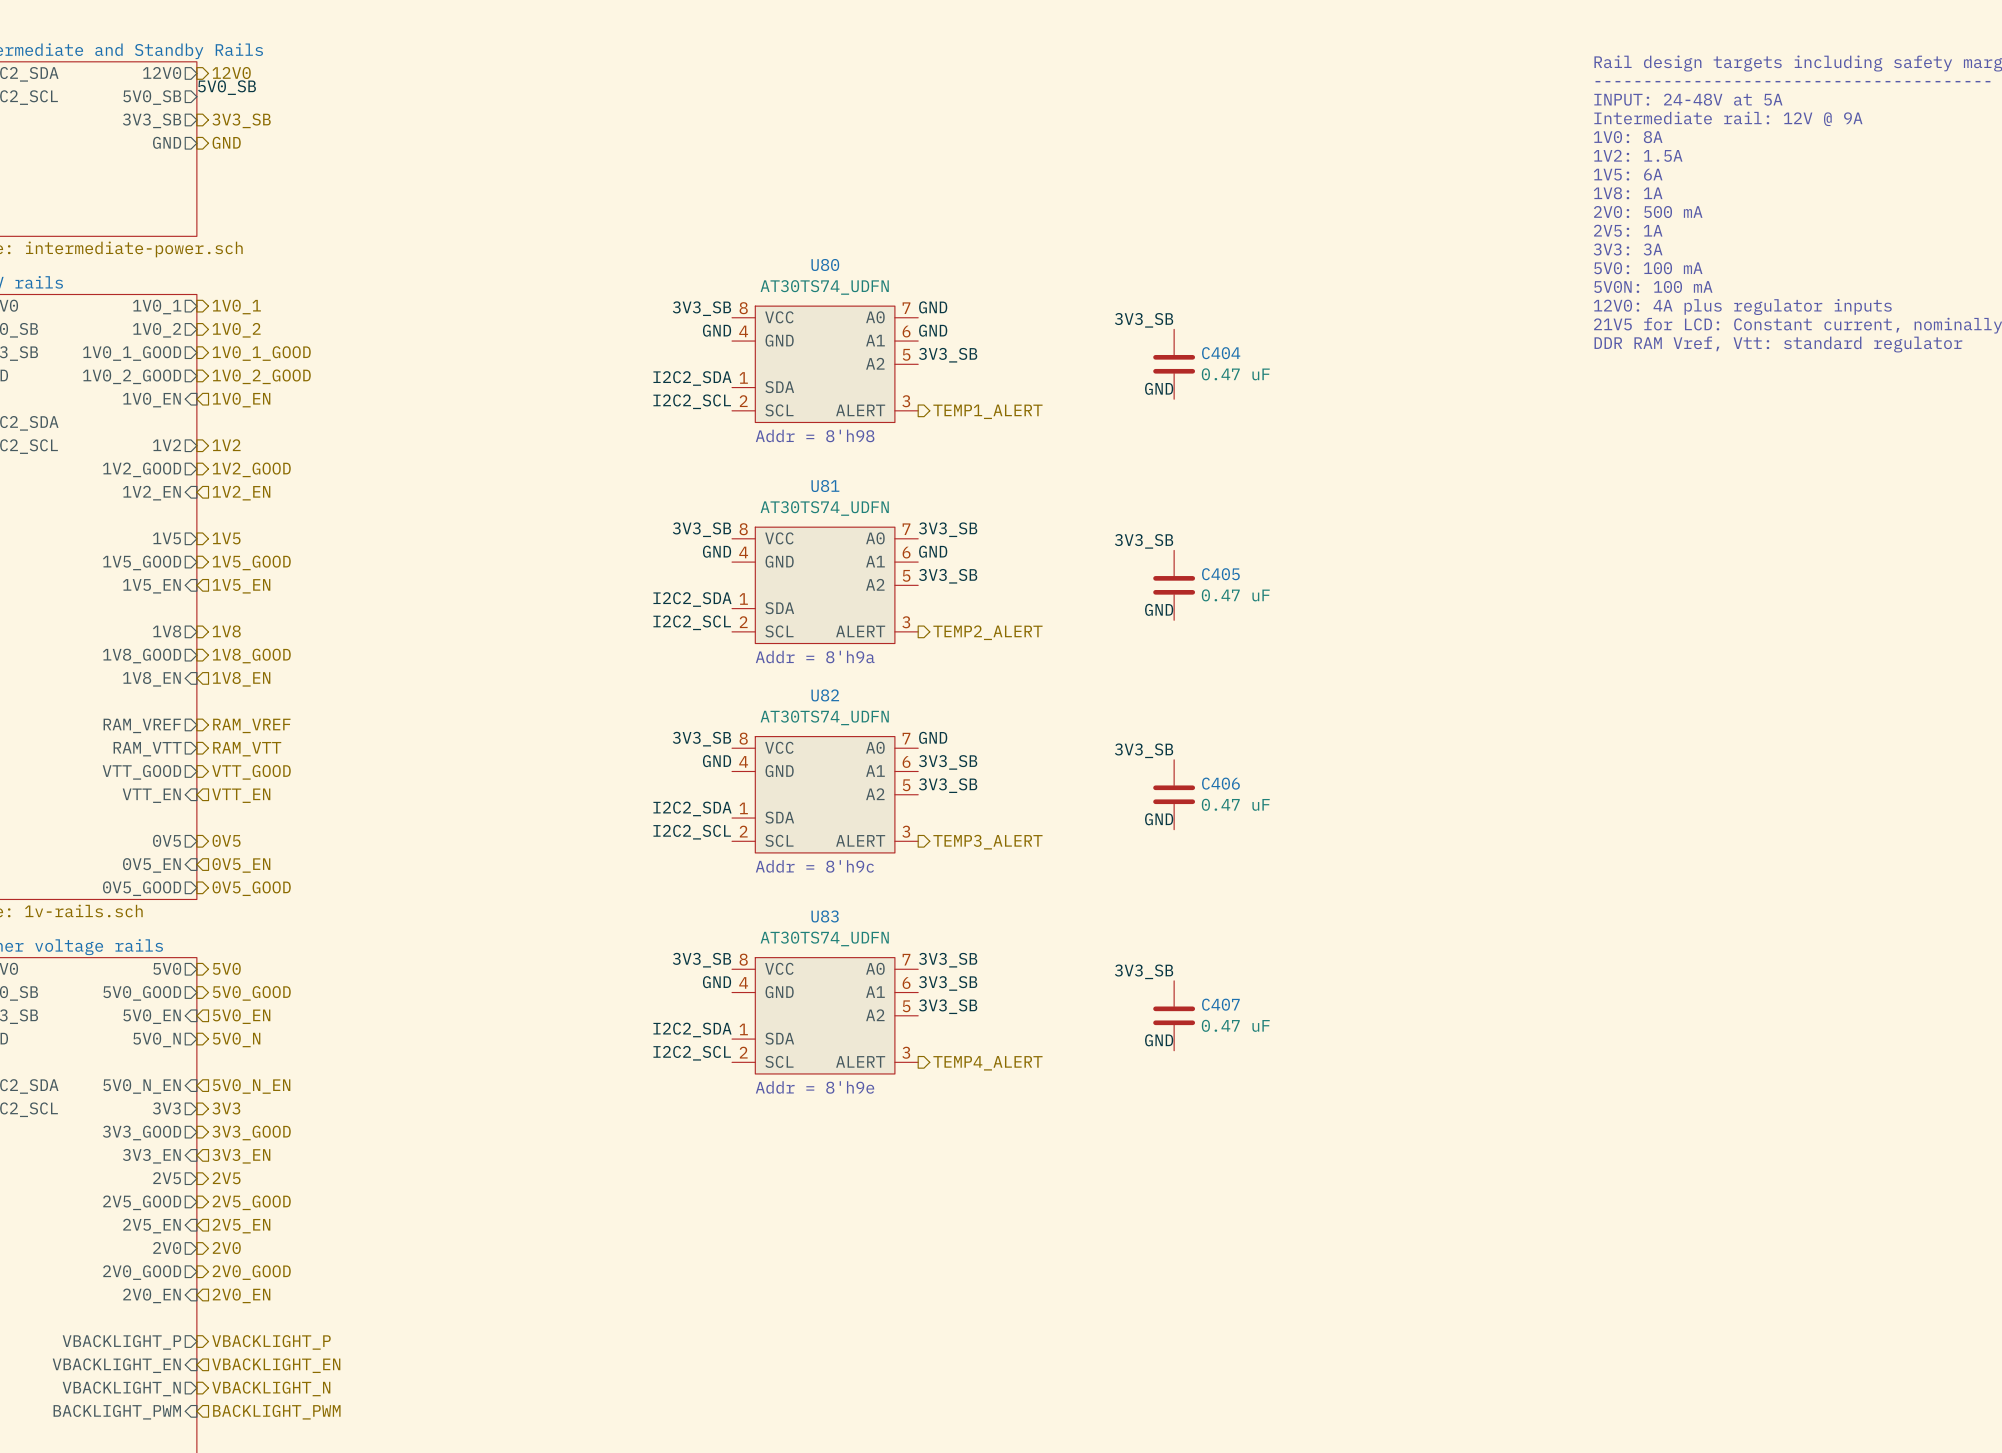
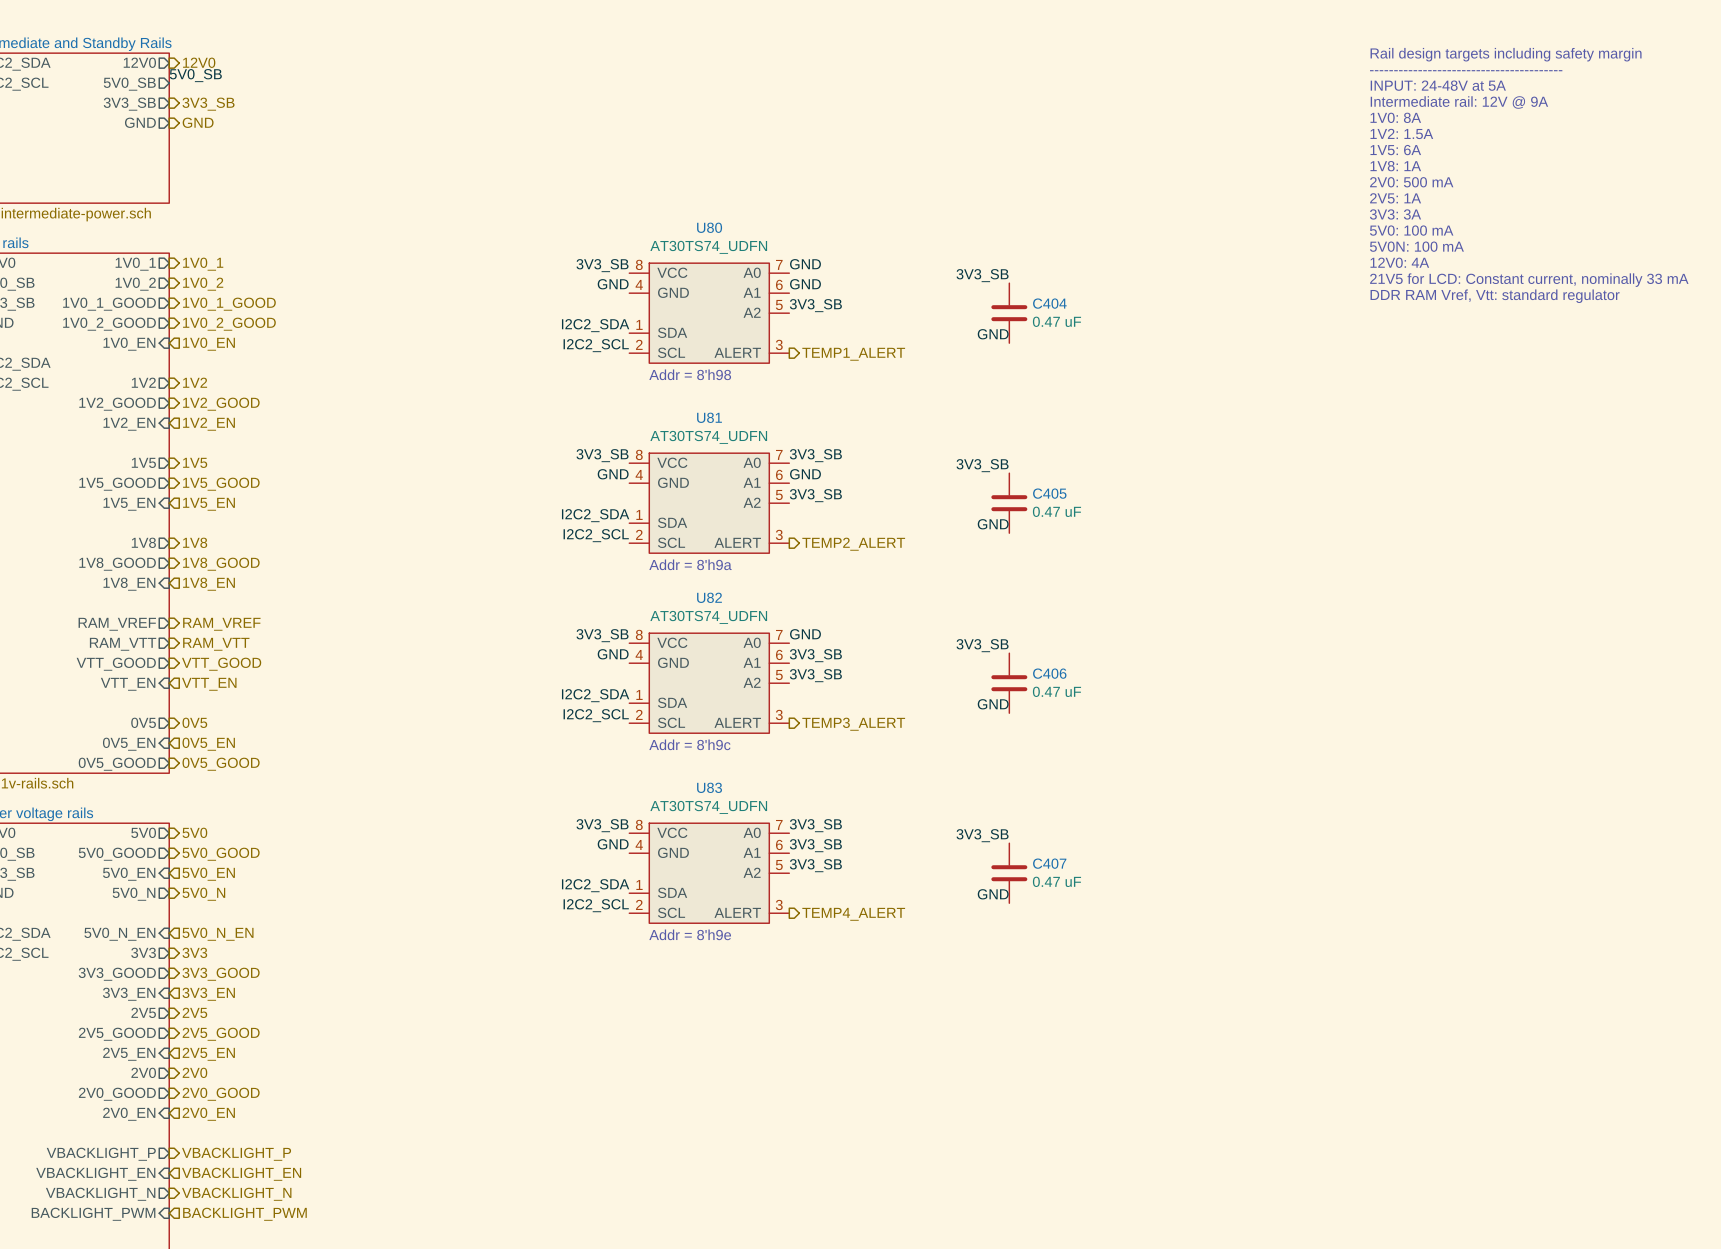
text: 12V0: 4A plus regulator inputs (1742, 307) -> 12V0: 4A (1399, 262)

